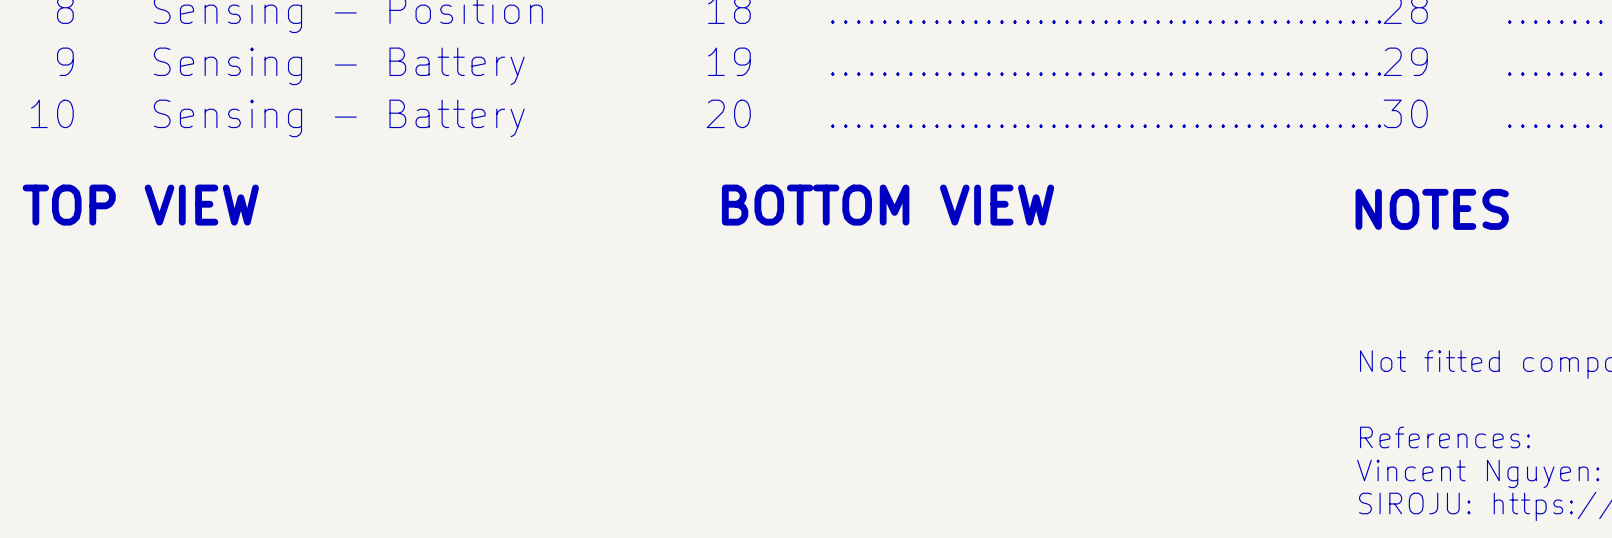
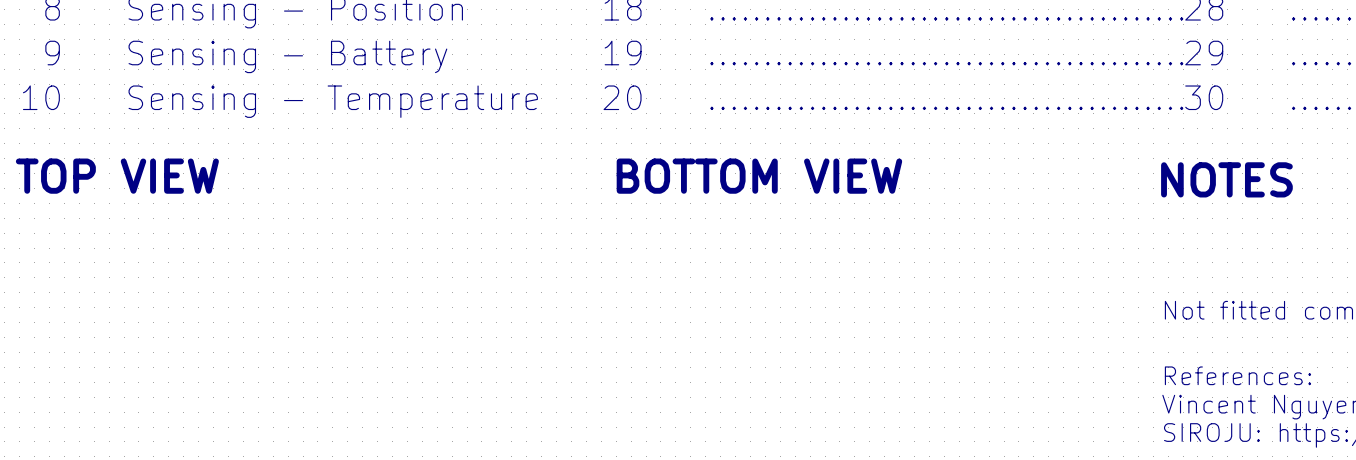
text: Sensing - Battery (339, 118) -> Sensing - Temperature (333, 101)

